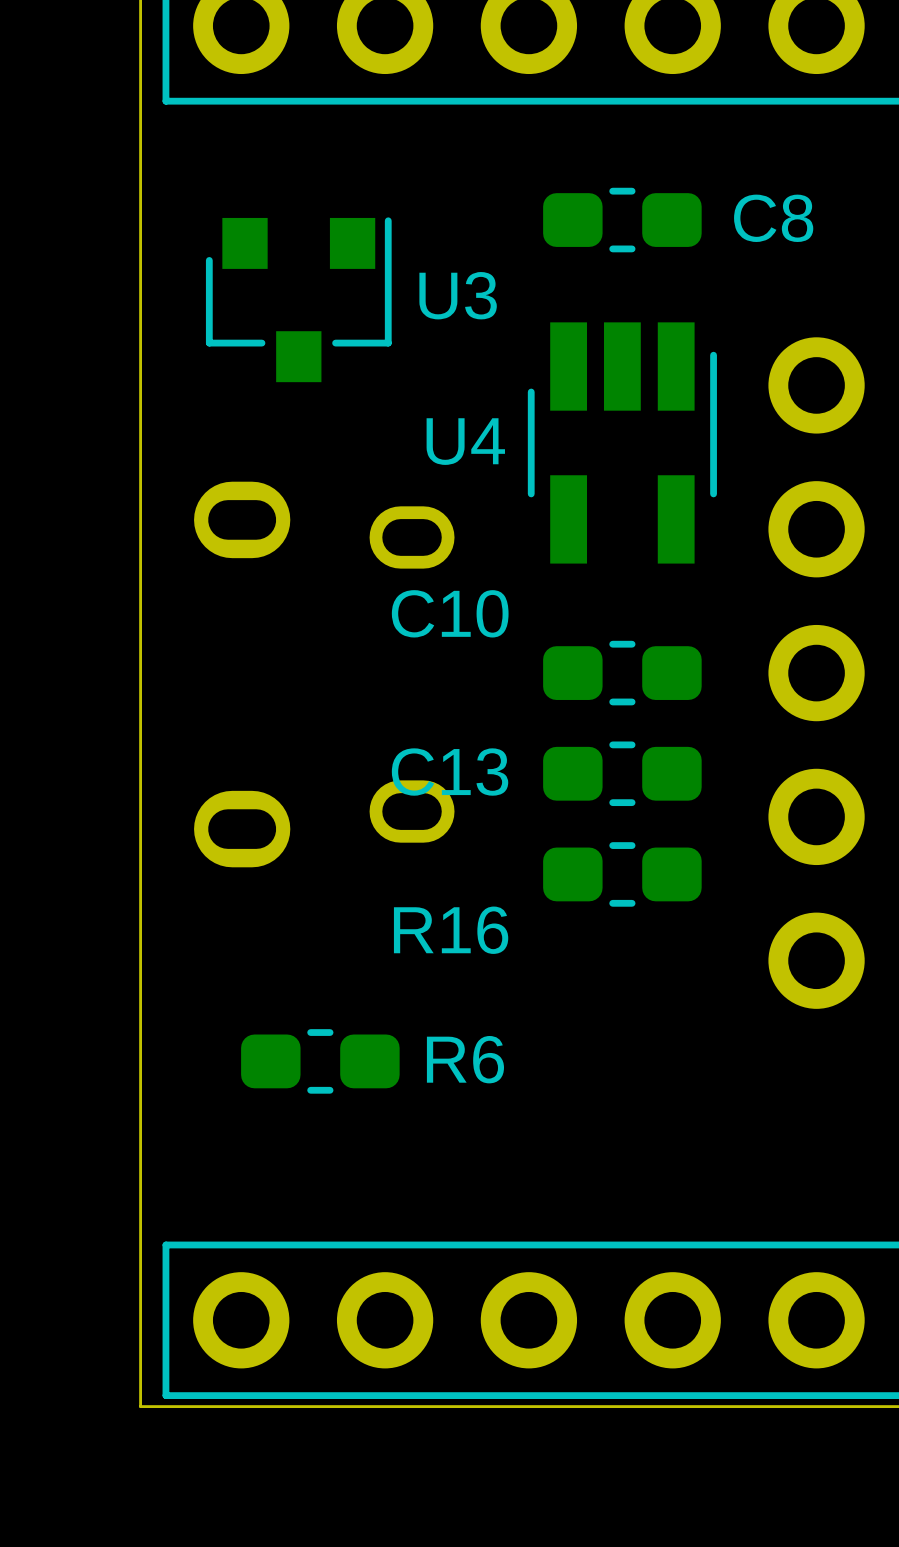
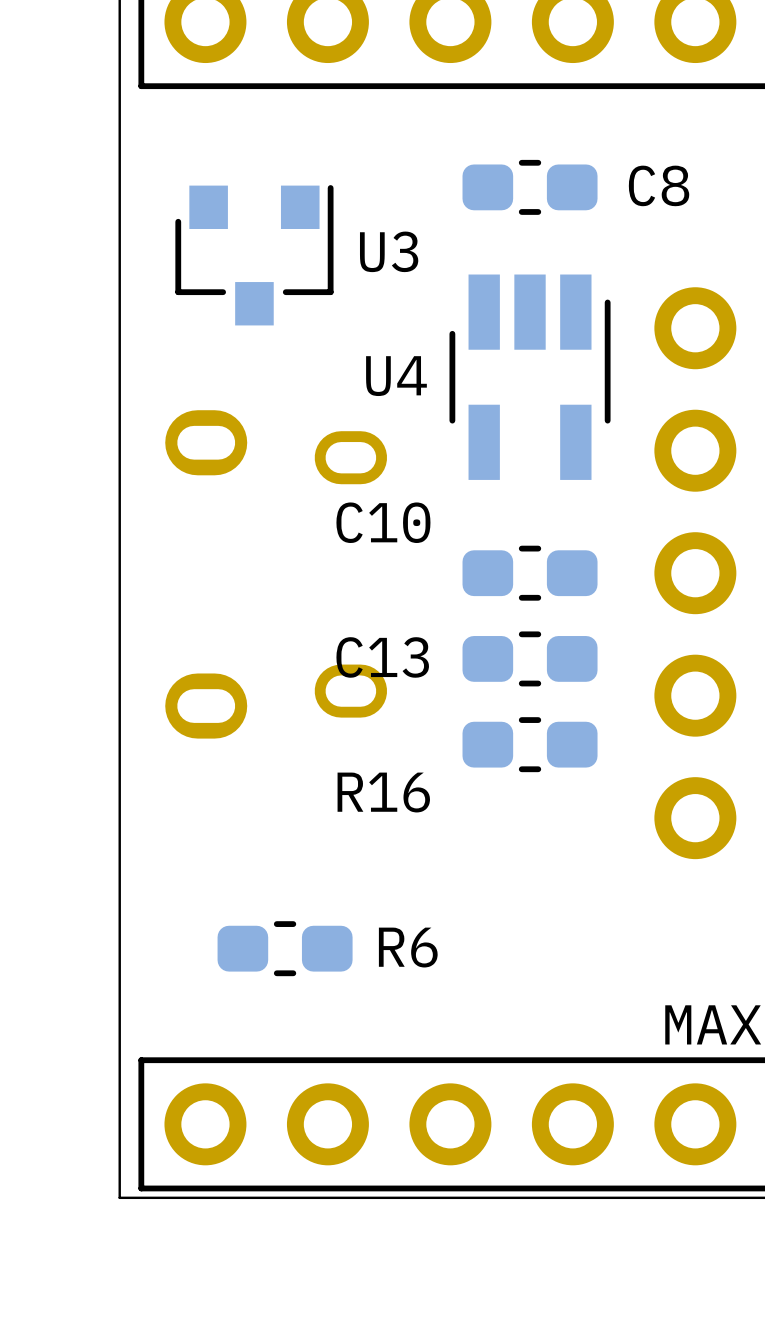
R6 position: (320, 1061) -> (285, 948)

